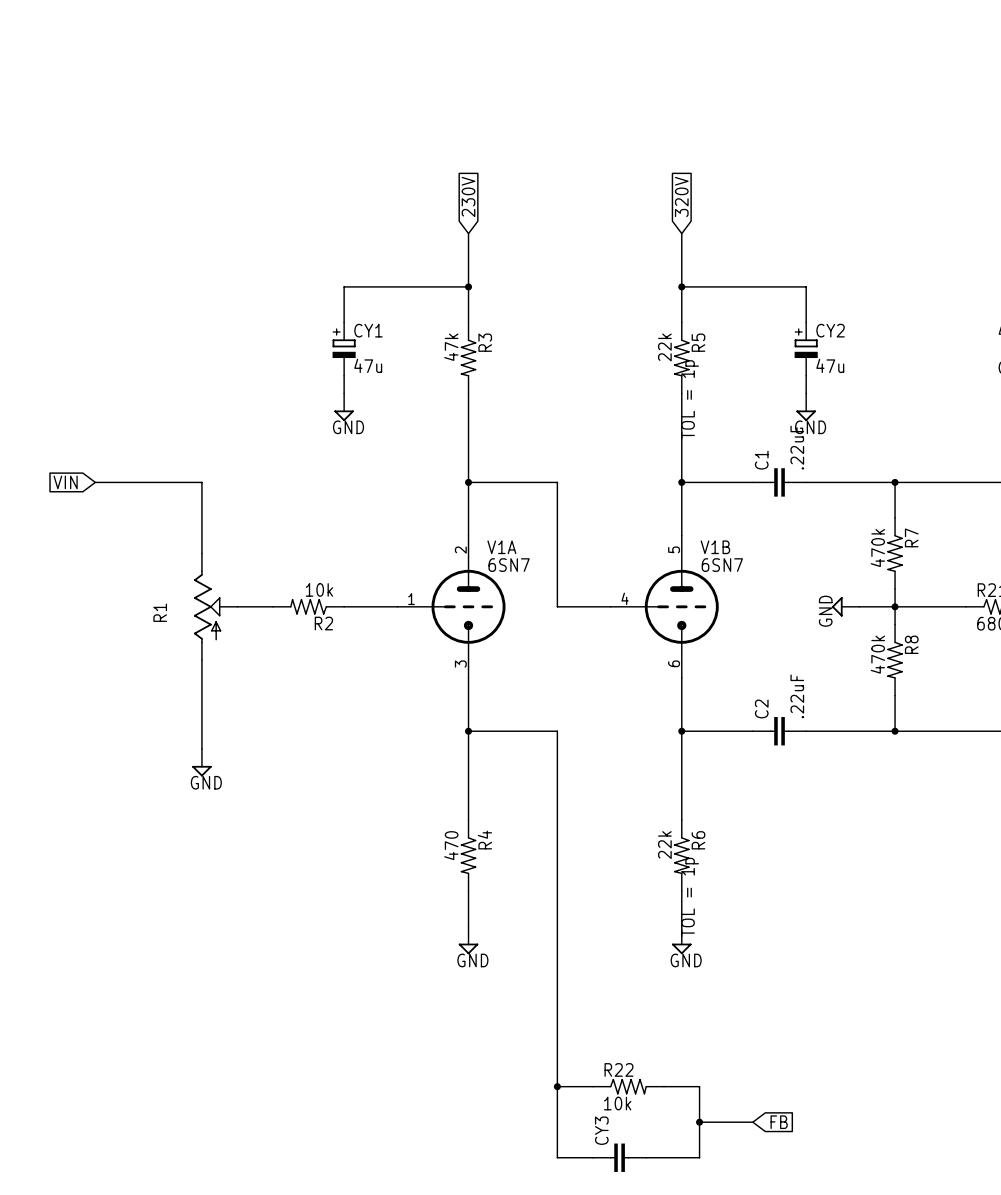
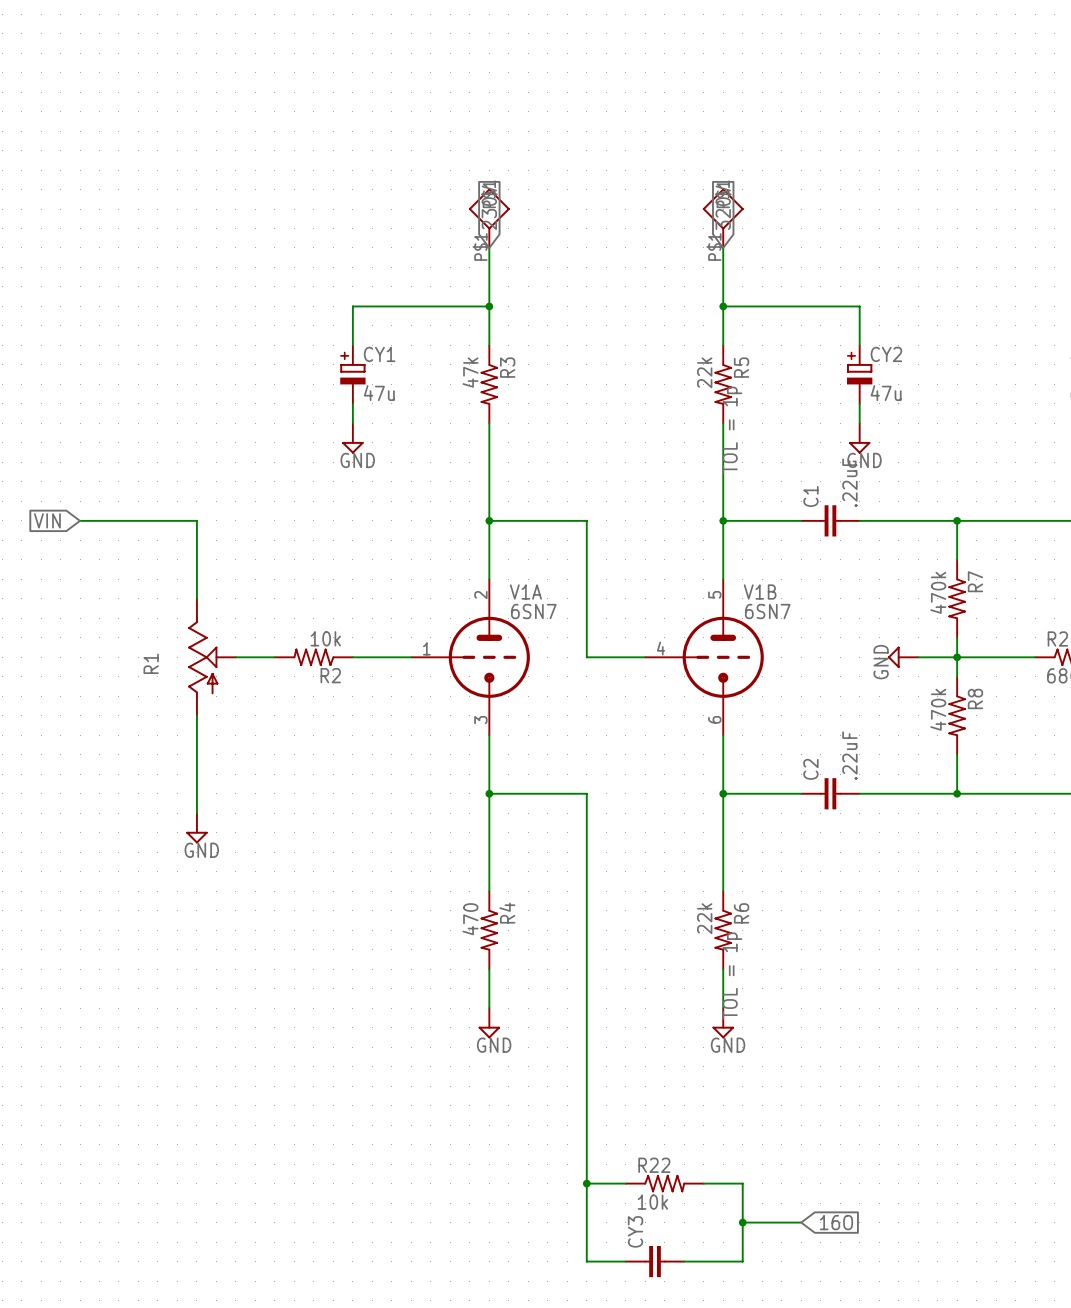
part: none -> (489, 218)
part: none -> (723, 218)
global label: FB (779, 1122) -> 16O (836, 1222)

